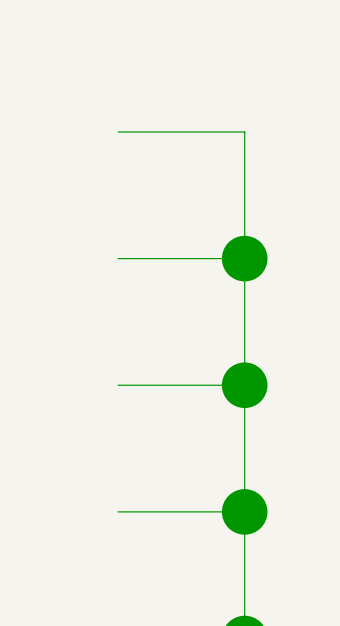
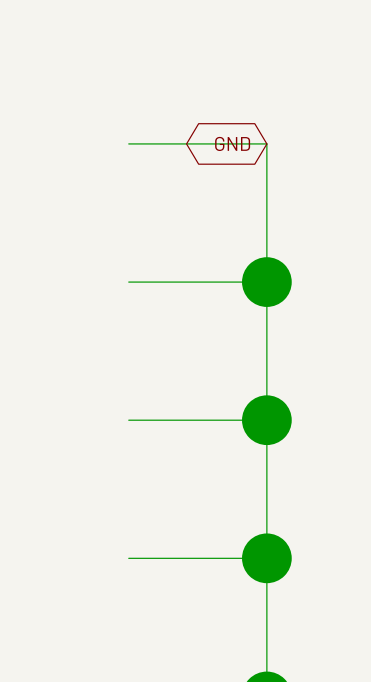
global label: none -> GND (232, 143)

